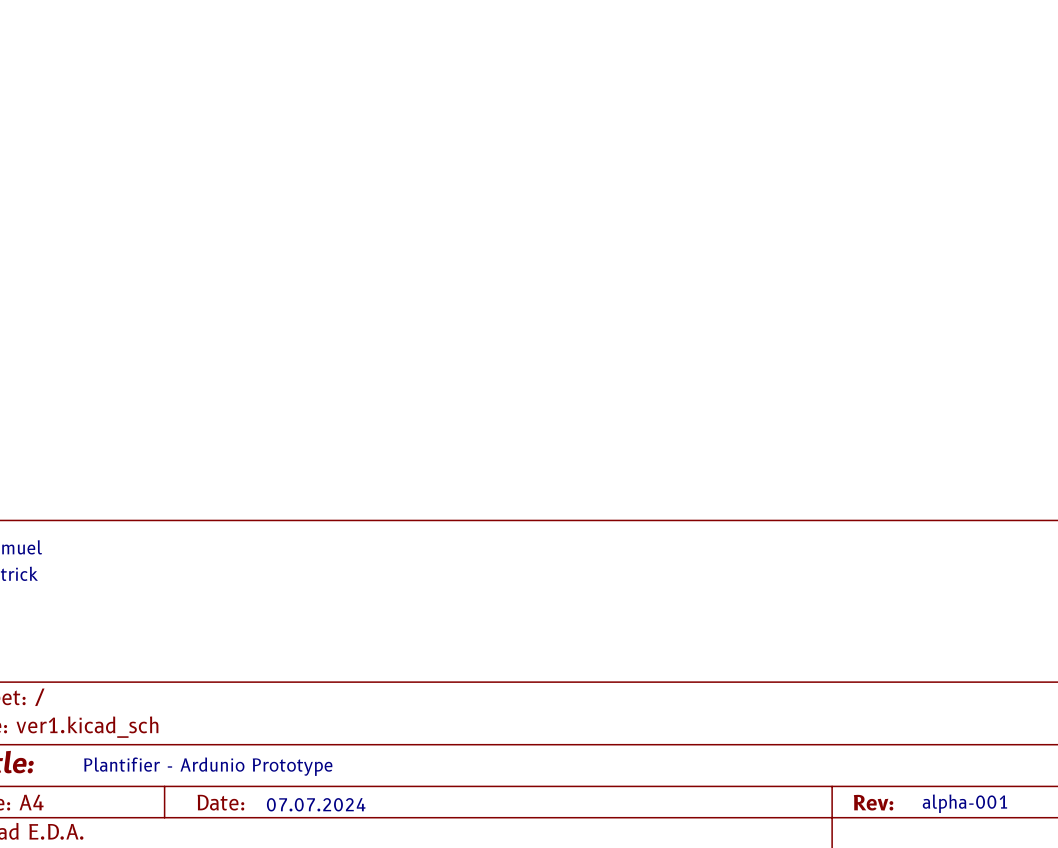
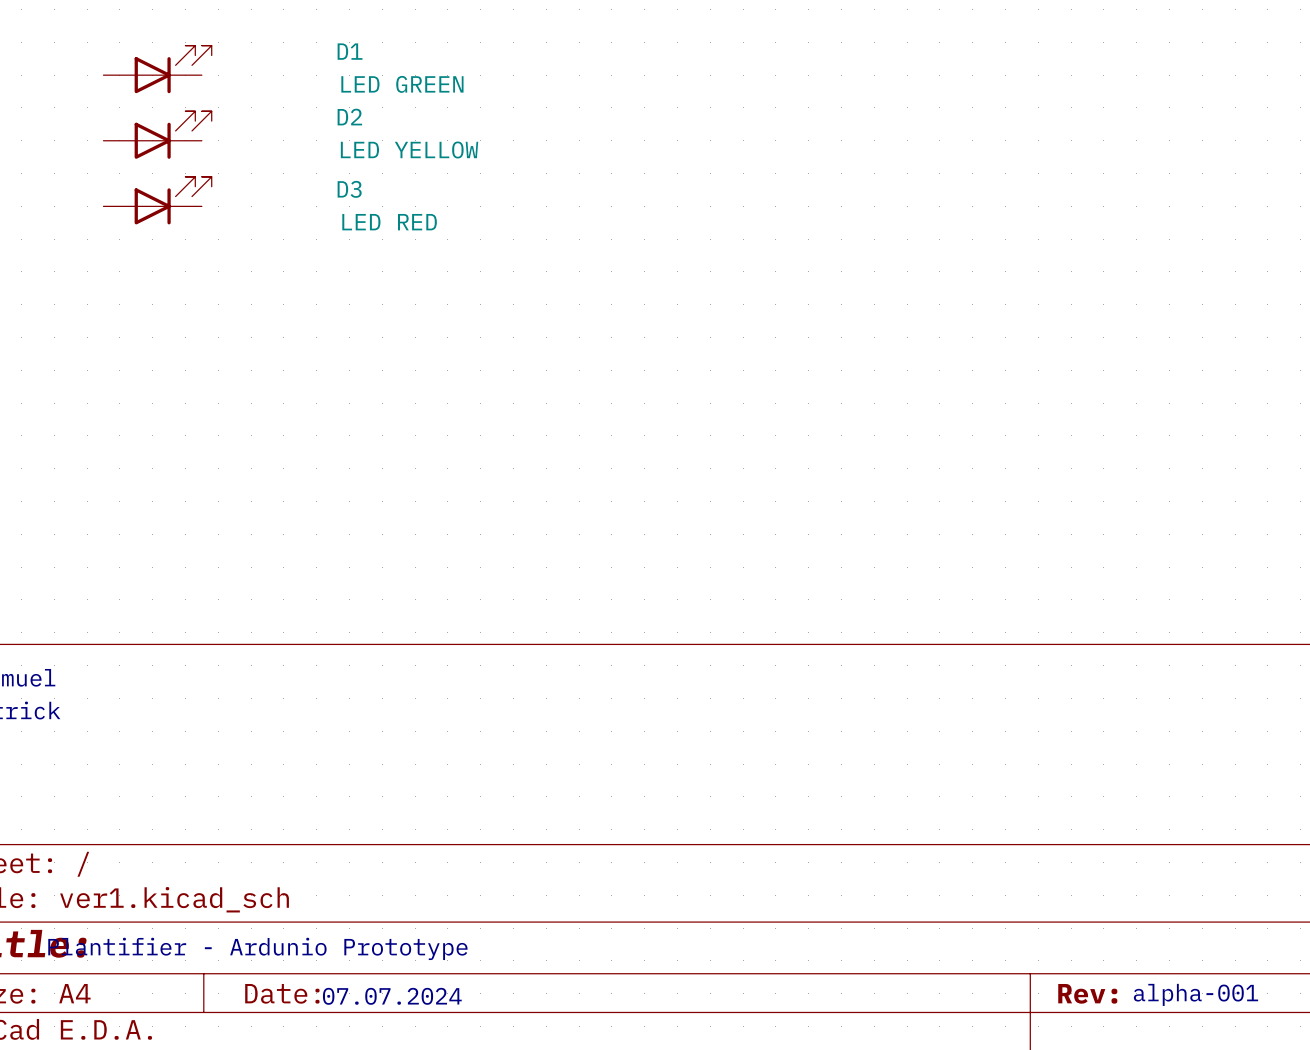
D1: none -> LED GREEN (157, 69)
D2: none -> LED YELLOW (157, 135)
D3: none -> LED RED (157, 200)

